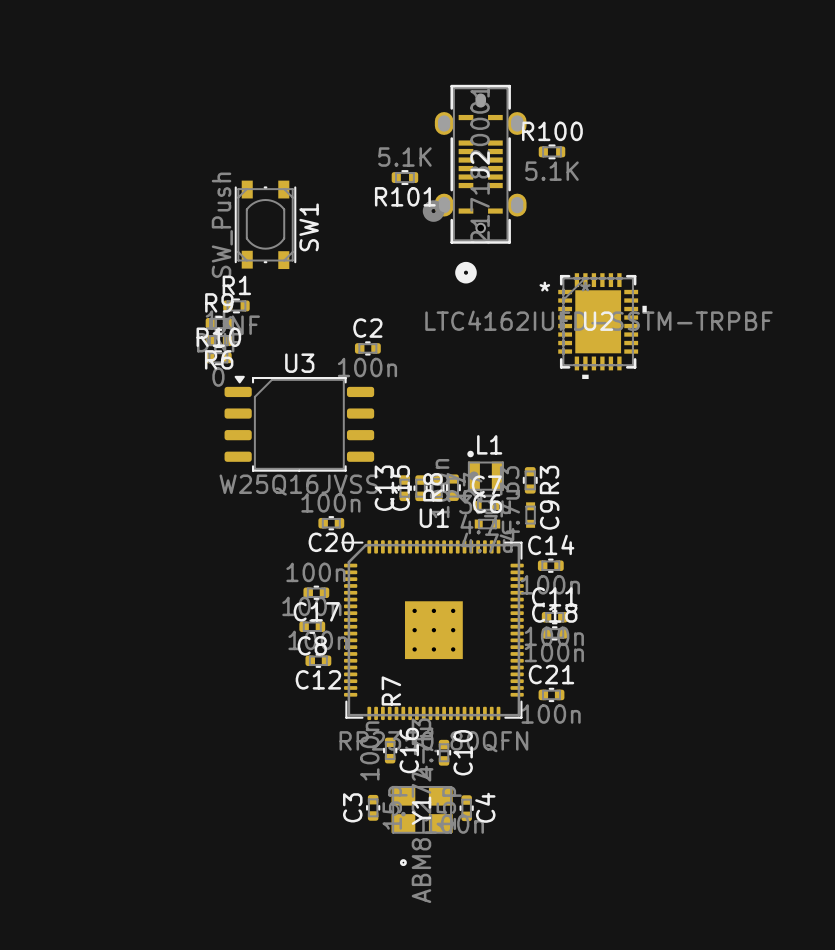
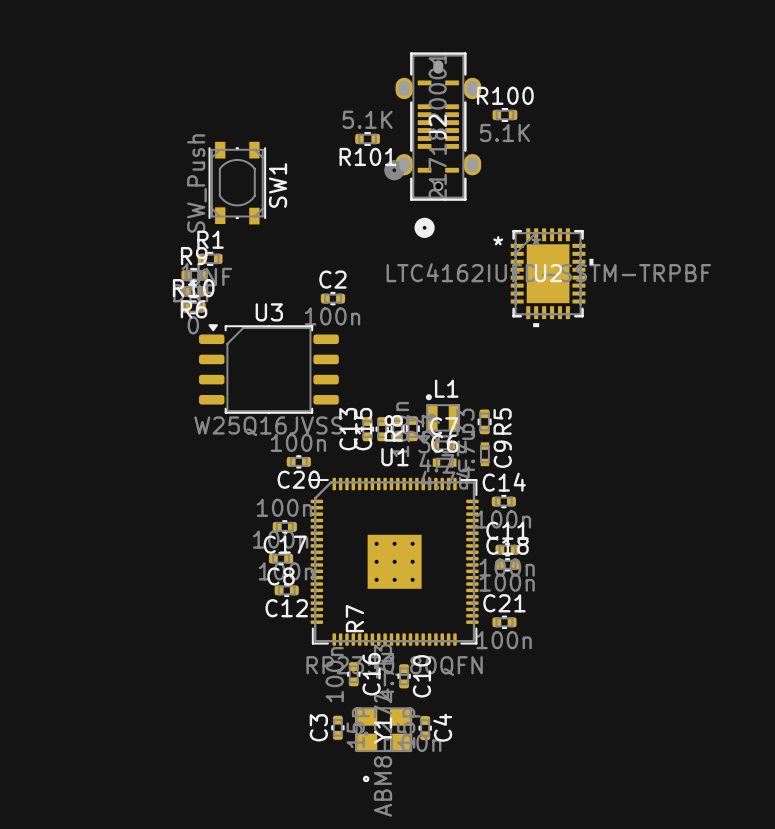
R3 name: R3 (549, 479) -> R5 (502, 421)

